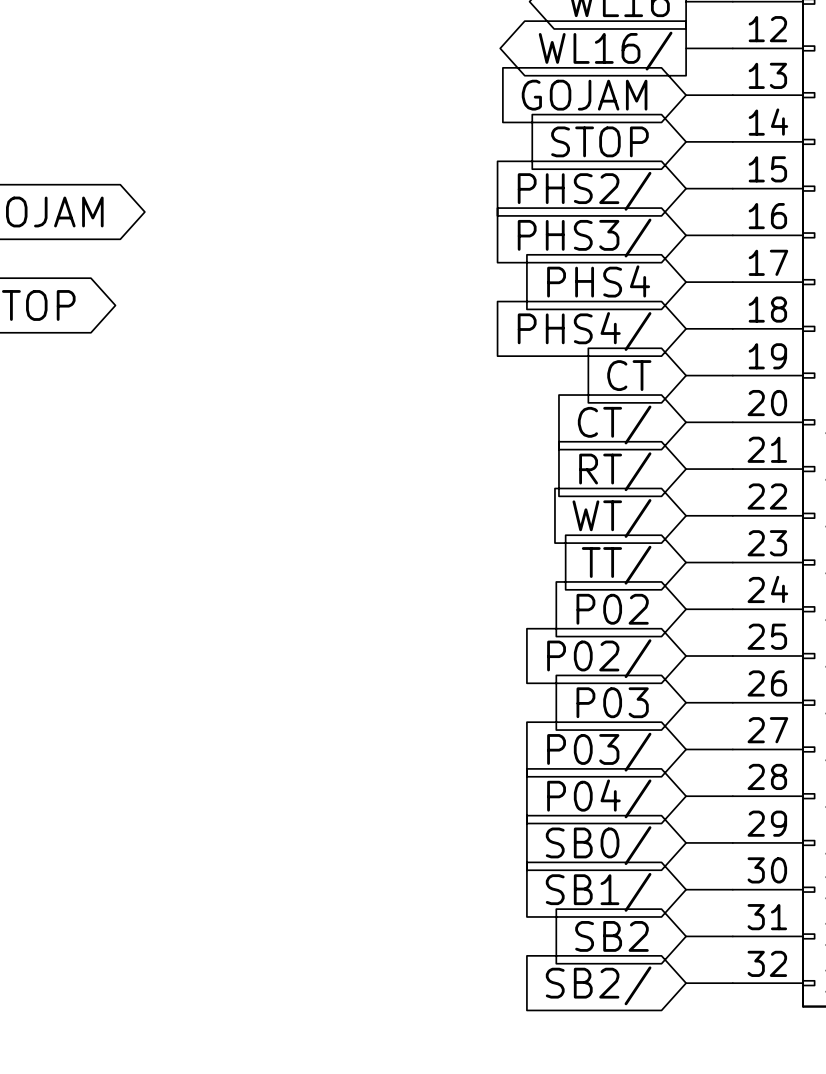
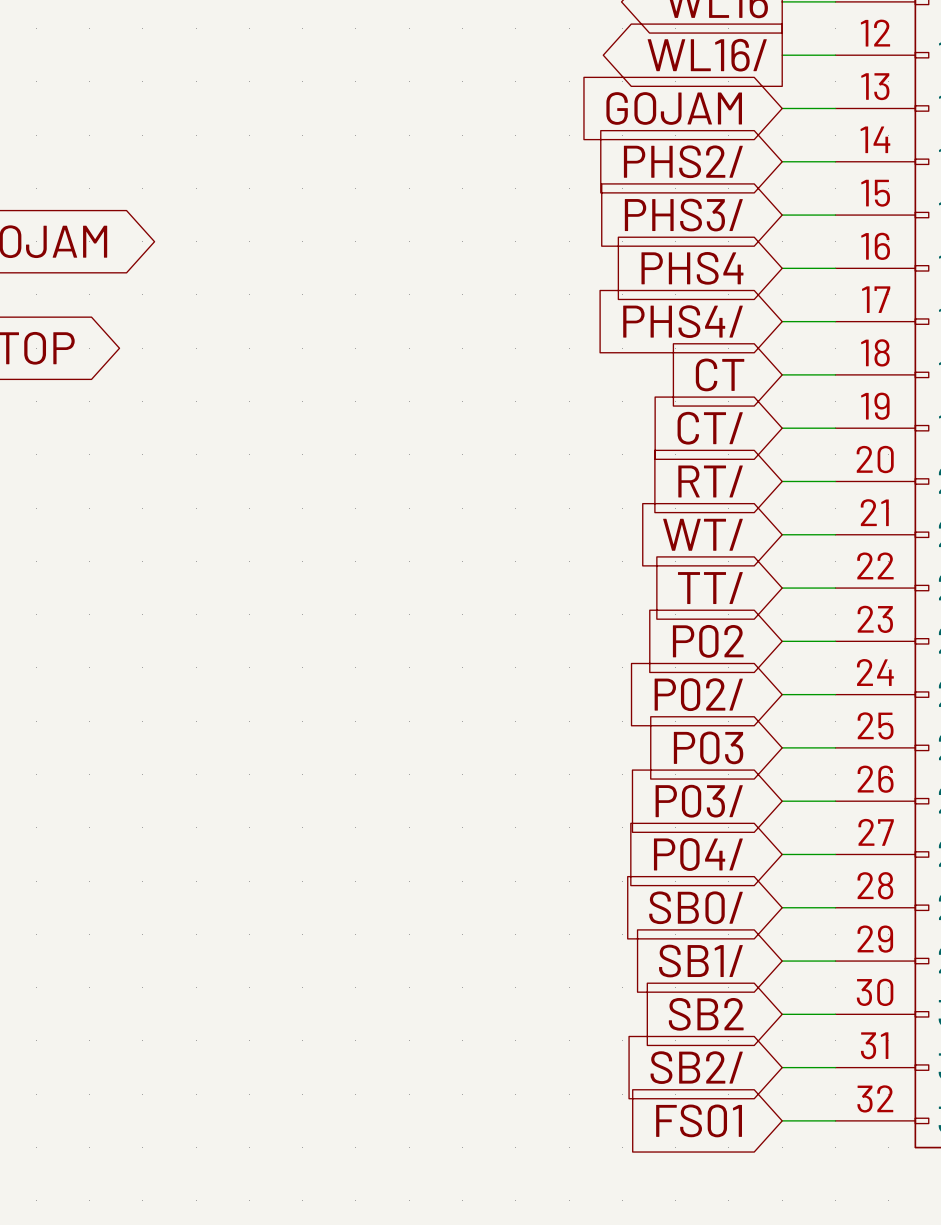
global label: STOP (599, 141) -> PHS2/ (683, 161)
global label: PHS2/ (584, 191) -> PHS3/ (683, 215)
global label: PHS3/ (584, 238) -> PHS4 (692, 268)
global label: PHS4 (598, 281) -> PHS4/ (683, 321)
global label: PHS4/ (584, 331) -> CT (720, 374)
global label: CT (629, 375) -> CT/ (710, 428)
global label: CT/ (614, 424) -> RT/ (710, 481)
global label: RT/ (615, 471) -> WT/ (703, 534)
global label: WT/ (611, 518) -> TT/ (710, 588)
global label: TT/ (616, 565) -> P02 (708, 641)
global label: P02 (612, 609) -> P02/ (698, 694)
global label: P02/ (599, 658) -> P03 (708, 747)
global label: P03 (612, 702) -> P03/ (699, 801)
global label: P03/ (599, 752) -> P04/ (698, 854)
global label: P04/ (599, 798) -> SB0/ (696, 907)
global label: SB0/ (598, 845) -> SB1/ (700, 961)
global label: SB1/ (598, 892) -> SB2 (706, 1014)
global label: SB2 (611, 936) -> SB2/ (696, 1067)
global label: SB2/ (598, 985) -> FS01 (699, 1120)

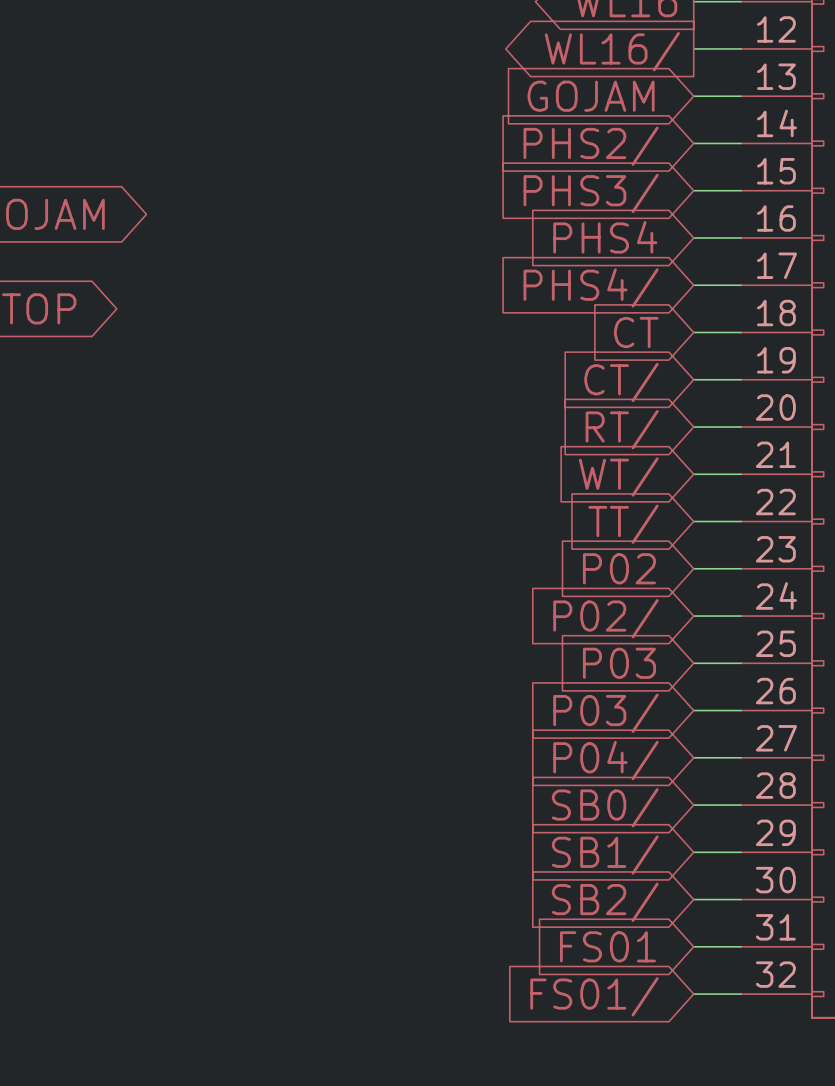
global label: SB2 (706, 1014) -> SB2/ (605, 902)
global label: SB2/ (696, 1067) -> FS01 (607, 946)
global label: FS01 (699, 1120) -> FS01/ (594, 996)

